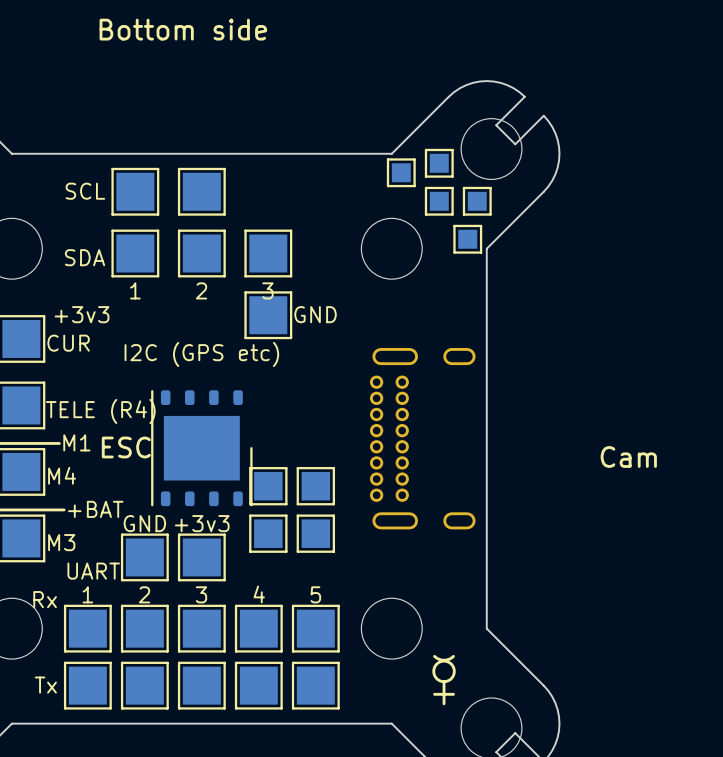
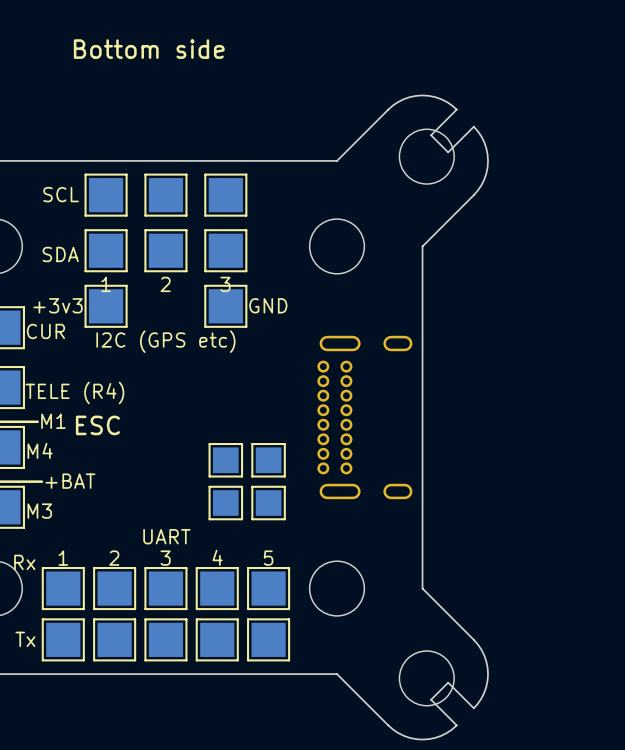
part: (439, 163) -> none
part: (401, 172) -> none
part: none -> (225, 195)
part: (439, 201) -> none
part: (477, 201) -> none
part: (467, 239) -> none
part: none -> (106, 306)
part: (201, 448) -> none
text: Cam (628, 456) -> none
text: GND (144, 523) -> none
text: +3v3 (202, 523) -> none
part: (144, 557) -> none
part: (201, 557) -> none
text position: UART (93, 571) -> UART (166, 536)
line: (453, 656) (444, 660) (434, 656) -> none
drawing: [432, 659, 456, 684] -> none
line: (444, 681) (444, 703) -> none
line: (453, 694) (434, 694) -> none

